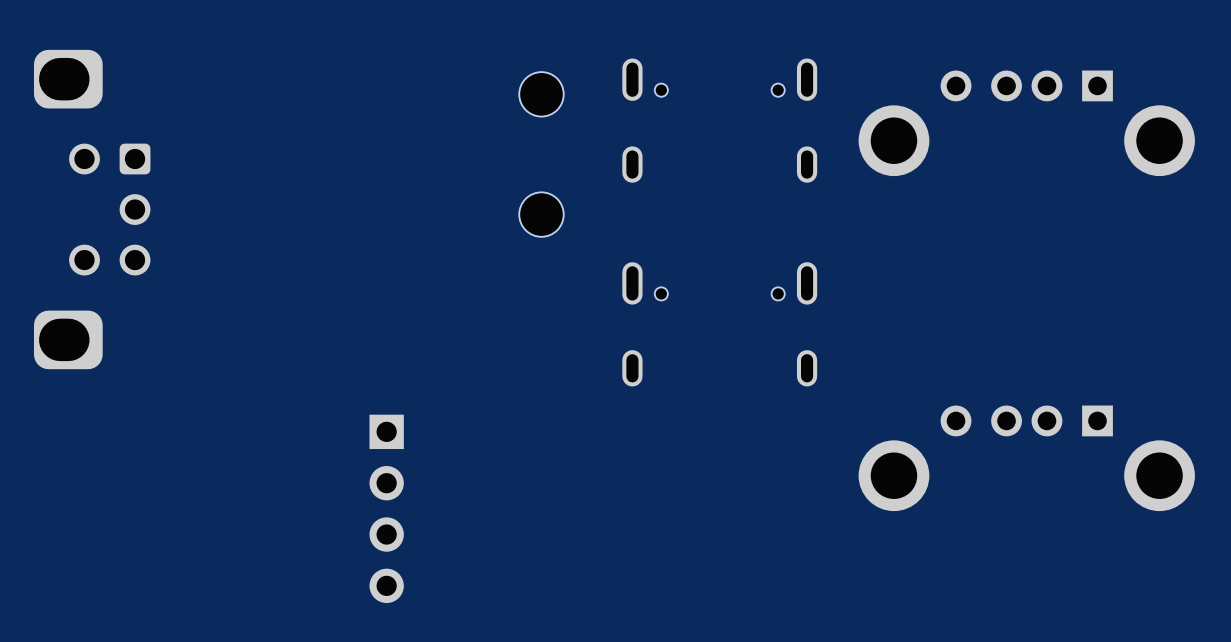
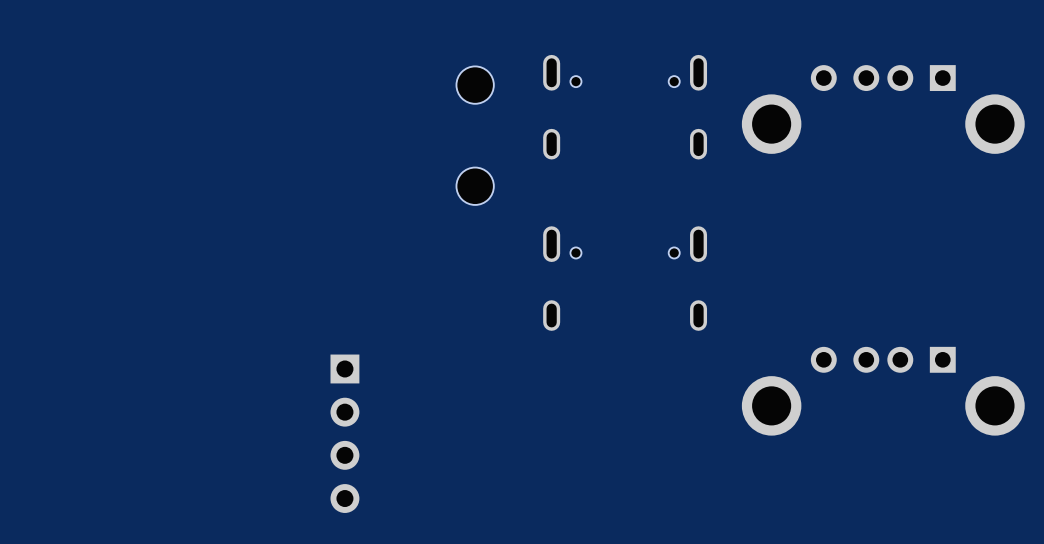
part: (92, 209) -> none

